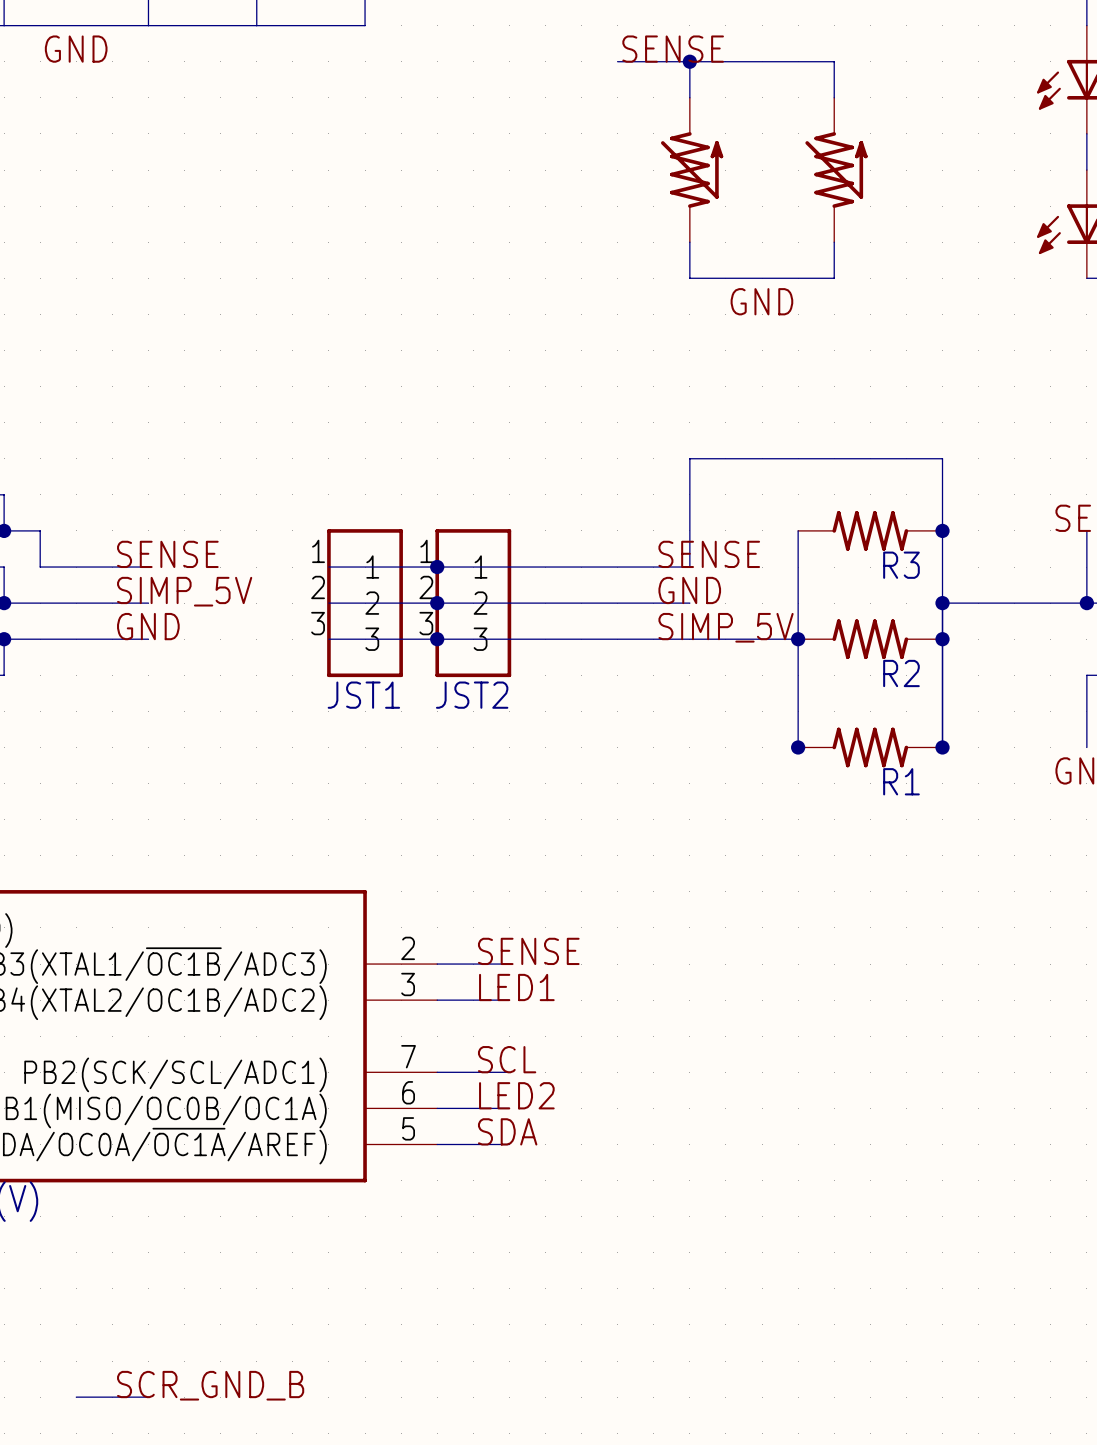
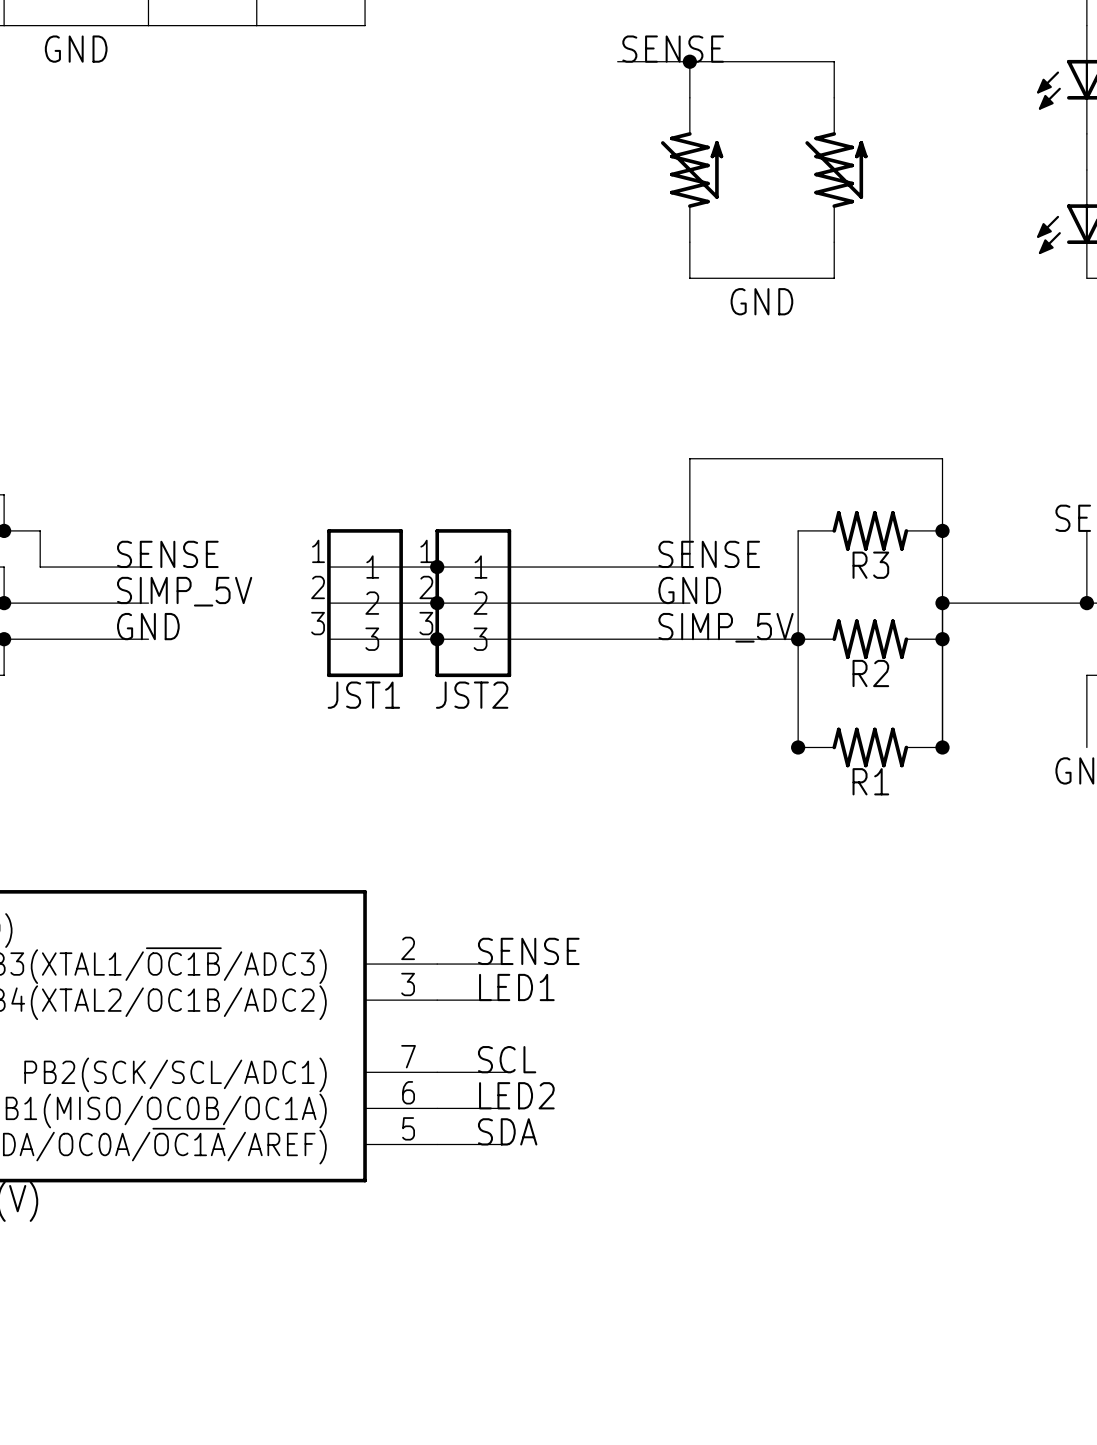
R3 name position: R3 (901, 565) -> R3 (870, 565)
R2 name position: R2 (901, 673) -> R2 (870, 673)
R1 name position: R1 (901, 781) -> R1 (870, 781)
label: SCR_GND_B (210, 1385) -> none
wire: (76, 1397) (148, 1397) -> none

